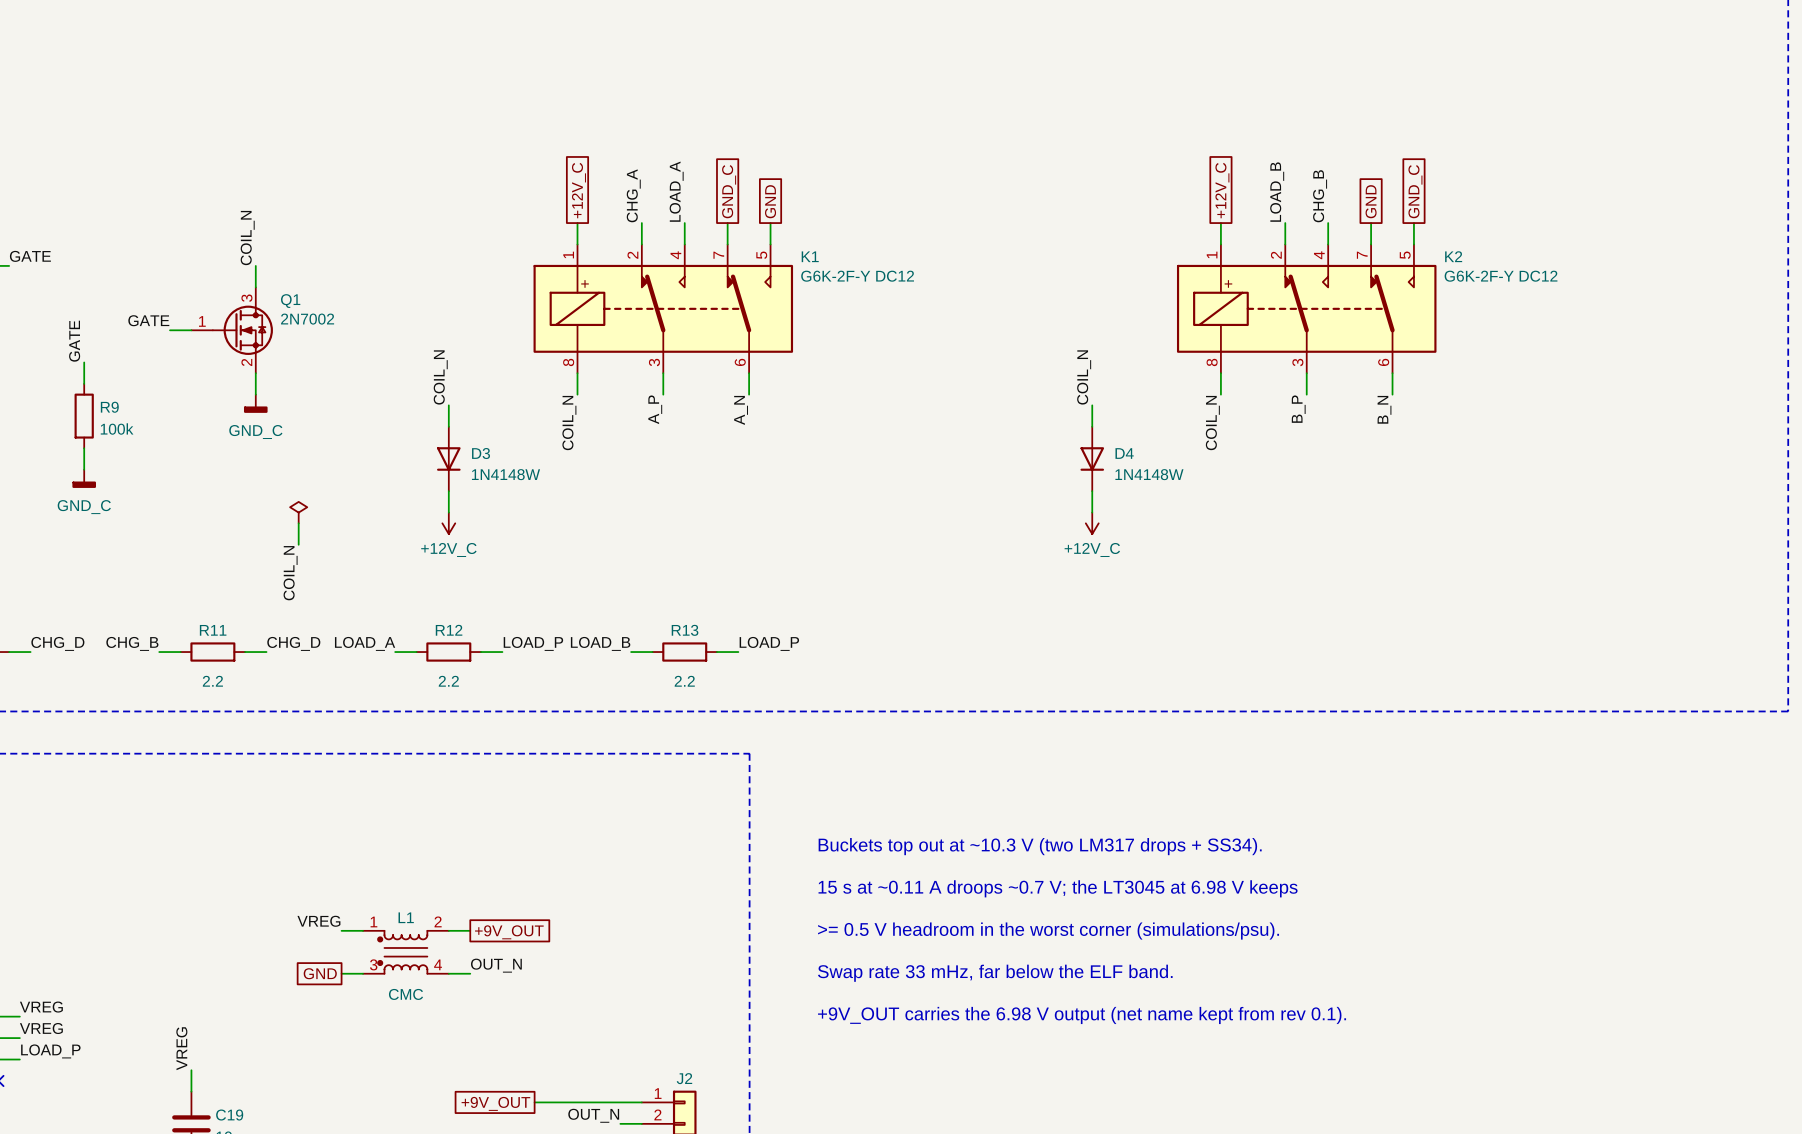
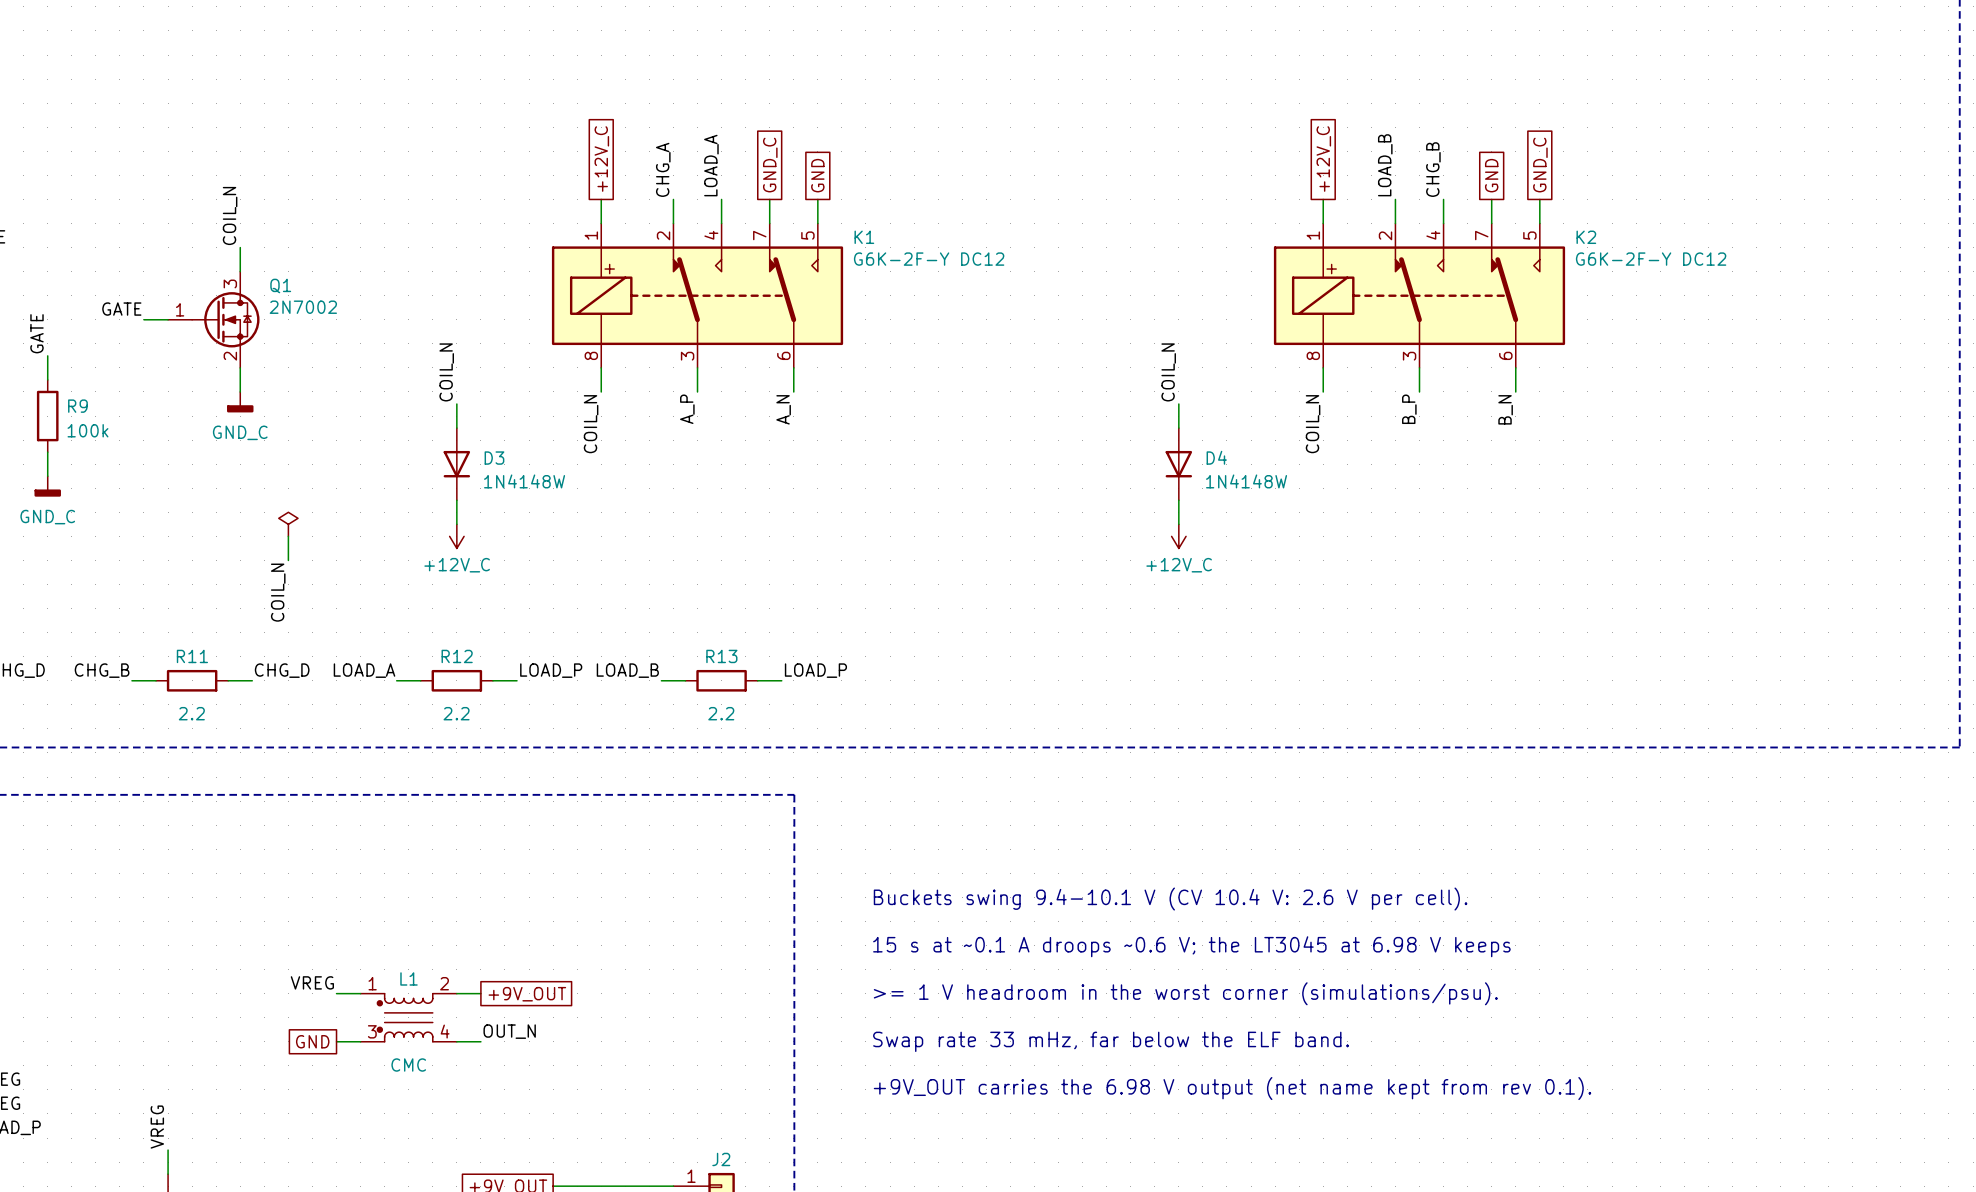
text: Buckets top out at ~10.3 V (two LM317 drops + SS34). (1040, 846) -> Buckets swing 9.4-10.1 V (CV 10.4 V: 2.6 V per cell). (1170, 899)
text: 15 s at ~0.11 A droops ~0.7 V; the LT3045 at 6.98 V keeps (1058, 888) -> 15 s at ~0.1 A droops ~0.6 V; the LT3045 at 6.98 V keeps (1191, 946)
text: >= 0.5 V headroom in the worst corner (simulations/psu). (1048, 931) -> >= 1 V headroom in the worst corner (simulations/psu). (1185, 993)

